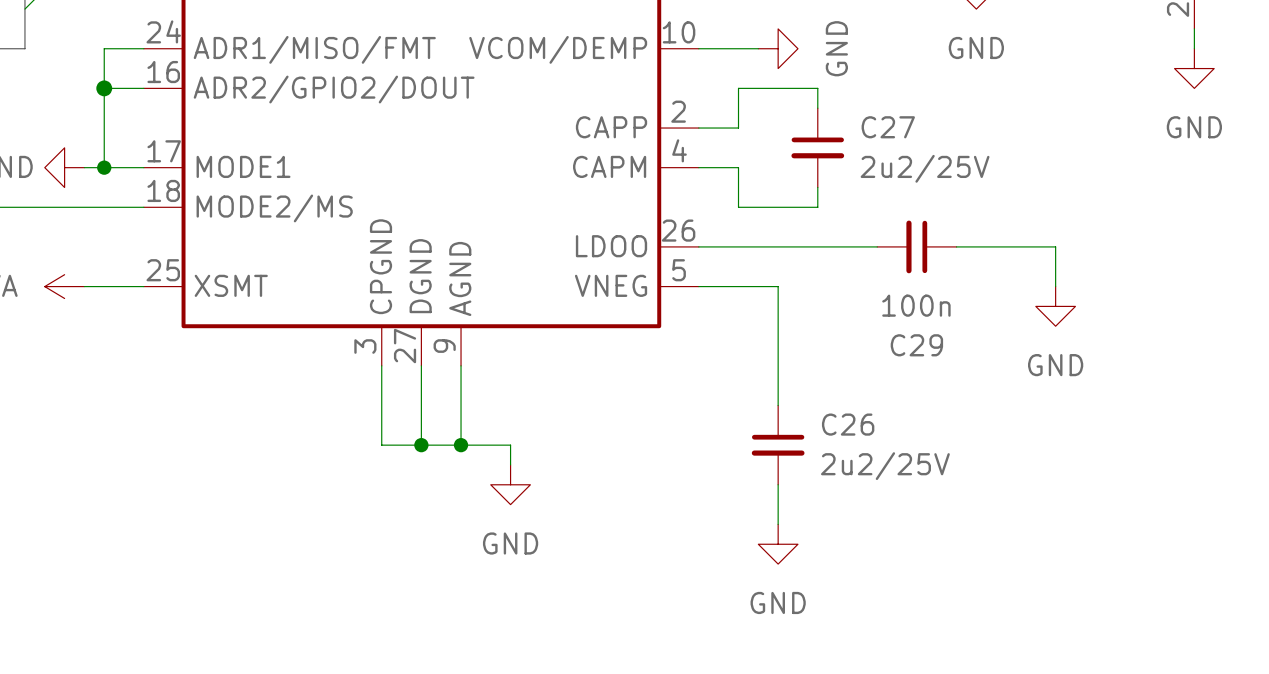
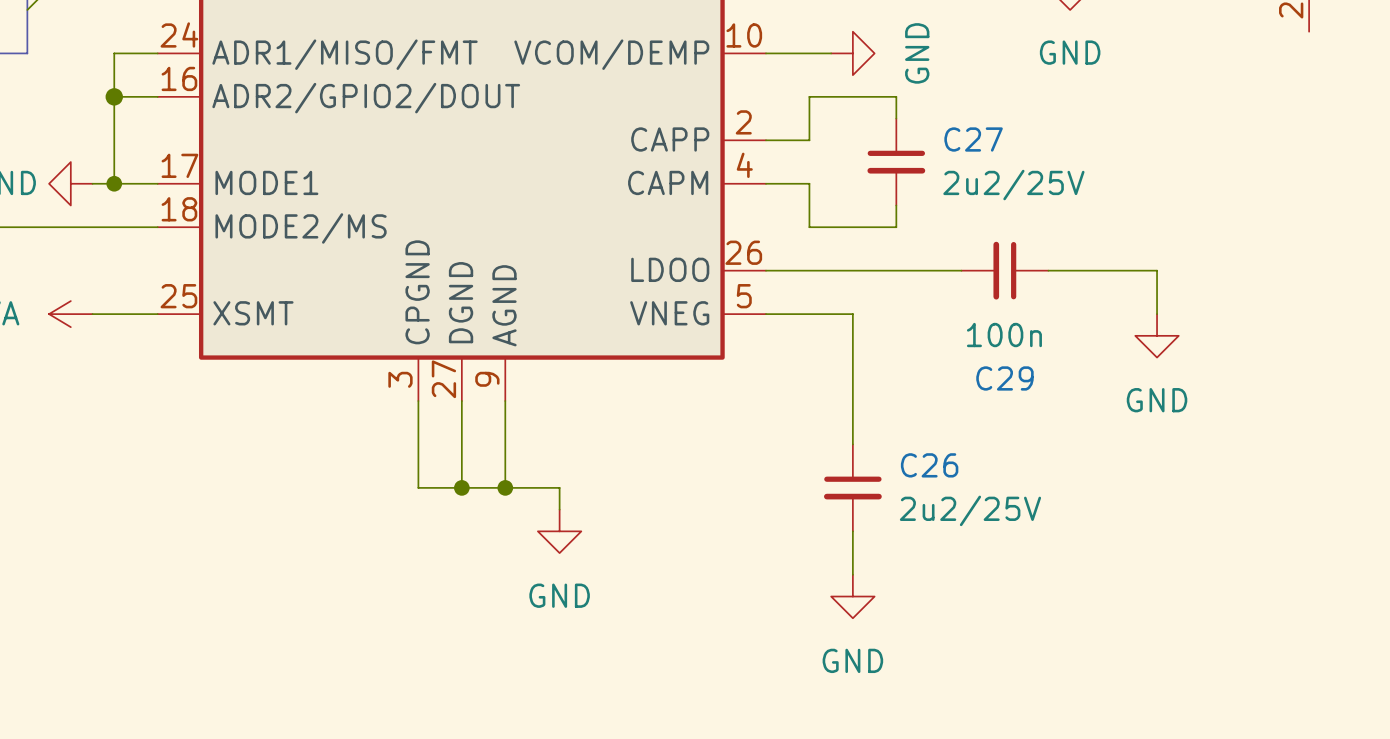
wire: (1194, 28) (1194, 48) -> none
power symbol: GND (1194, 68) -> none

